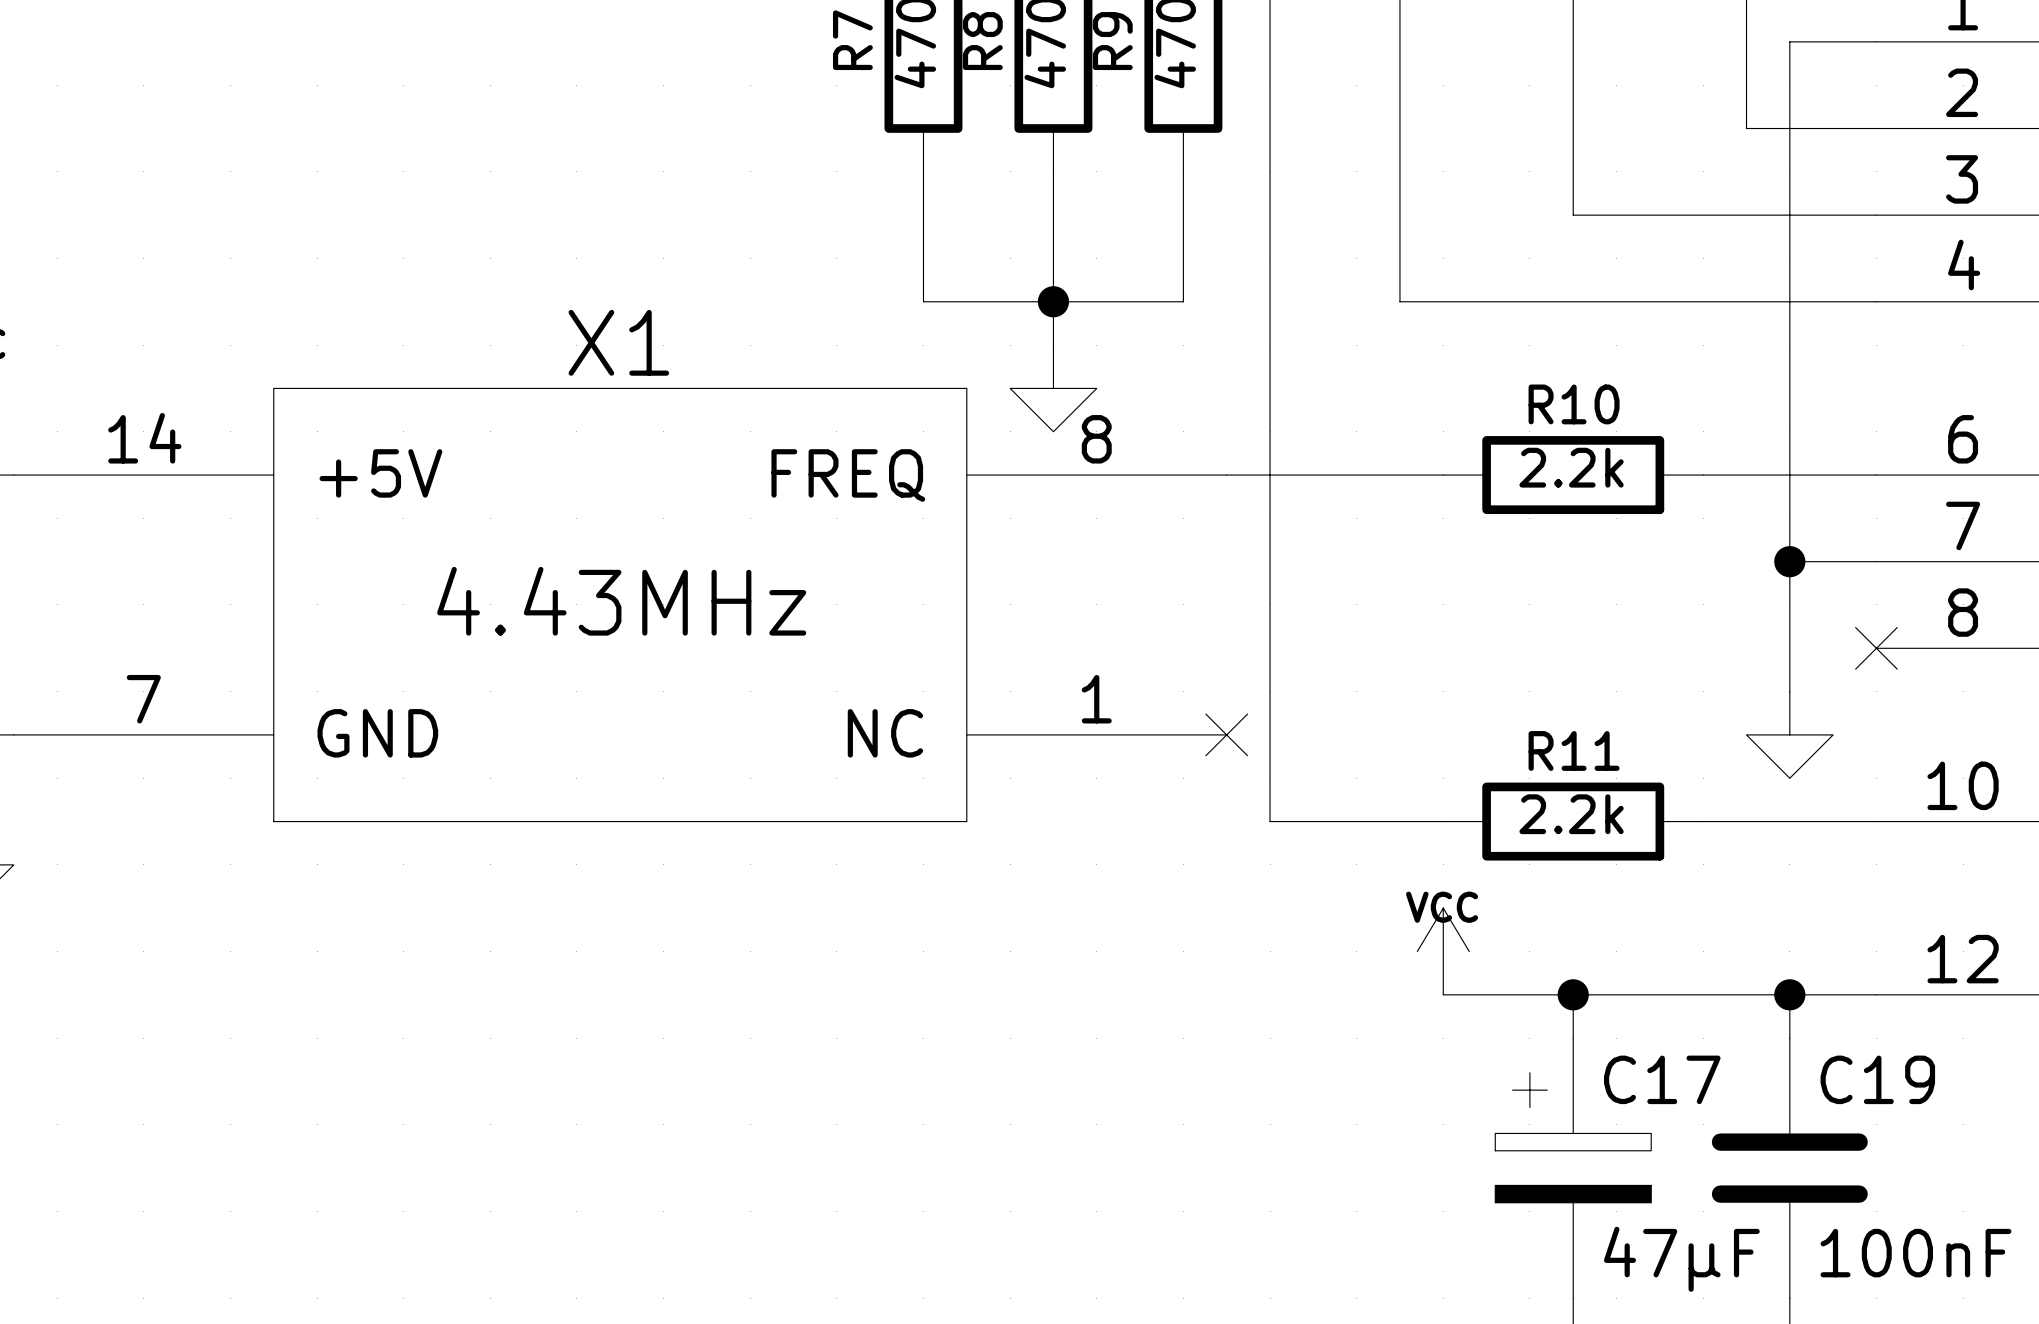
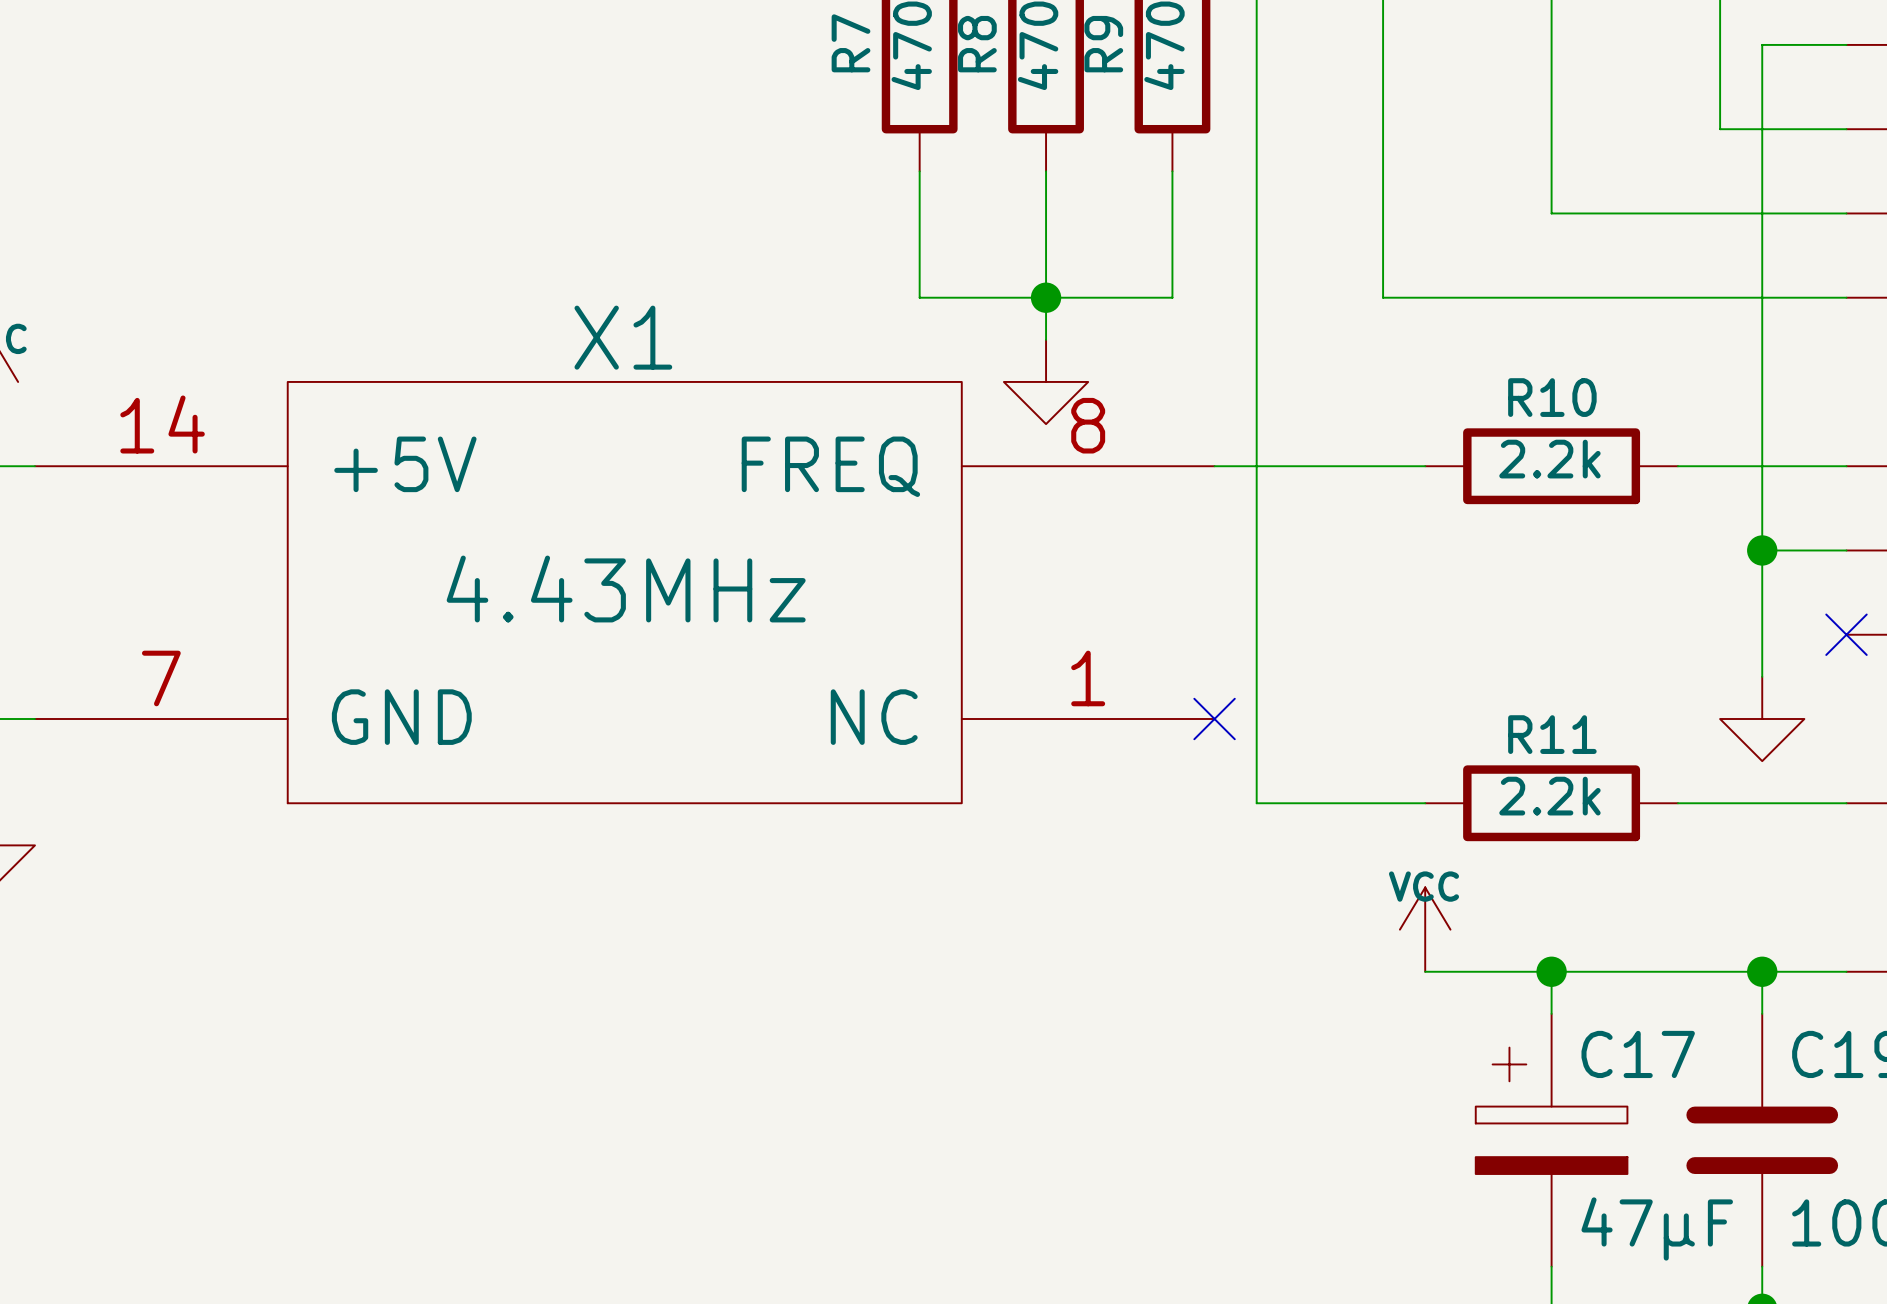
X1 symbol: [13, 388, 1227, 822] -> [34, 381, 1215, 804]

